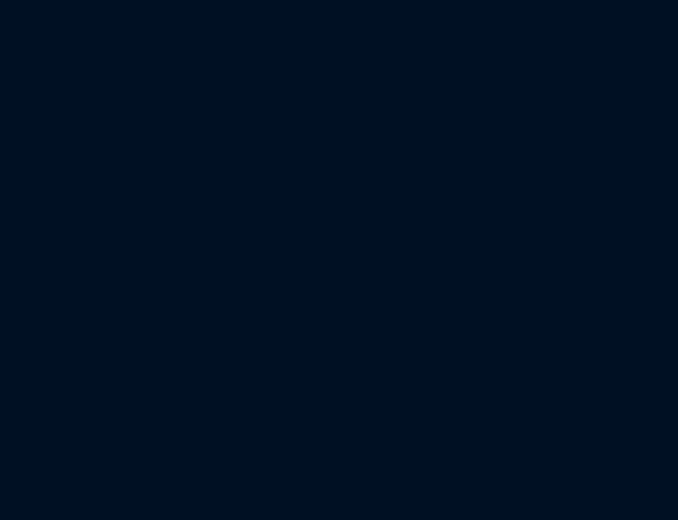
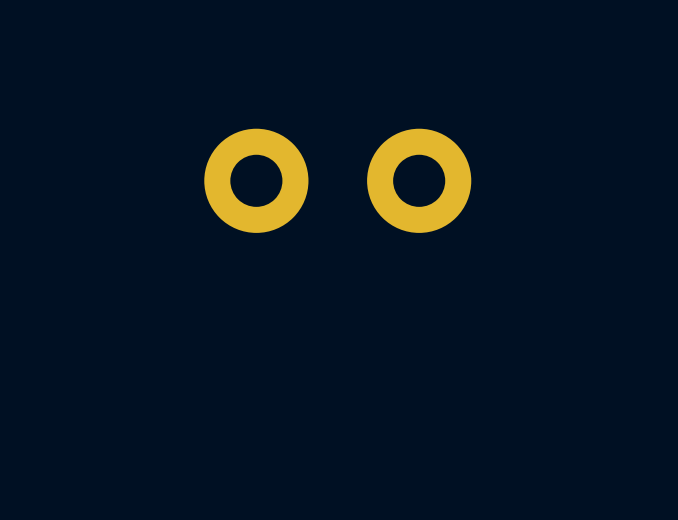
part: none -> (337, 180)

